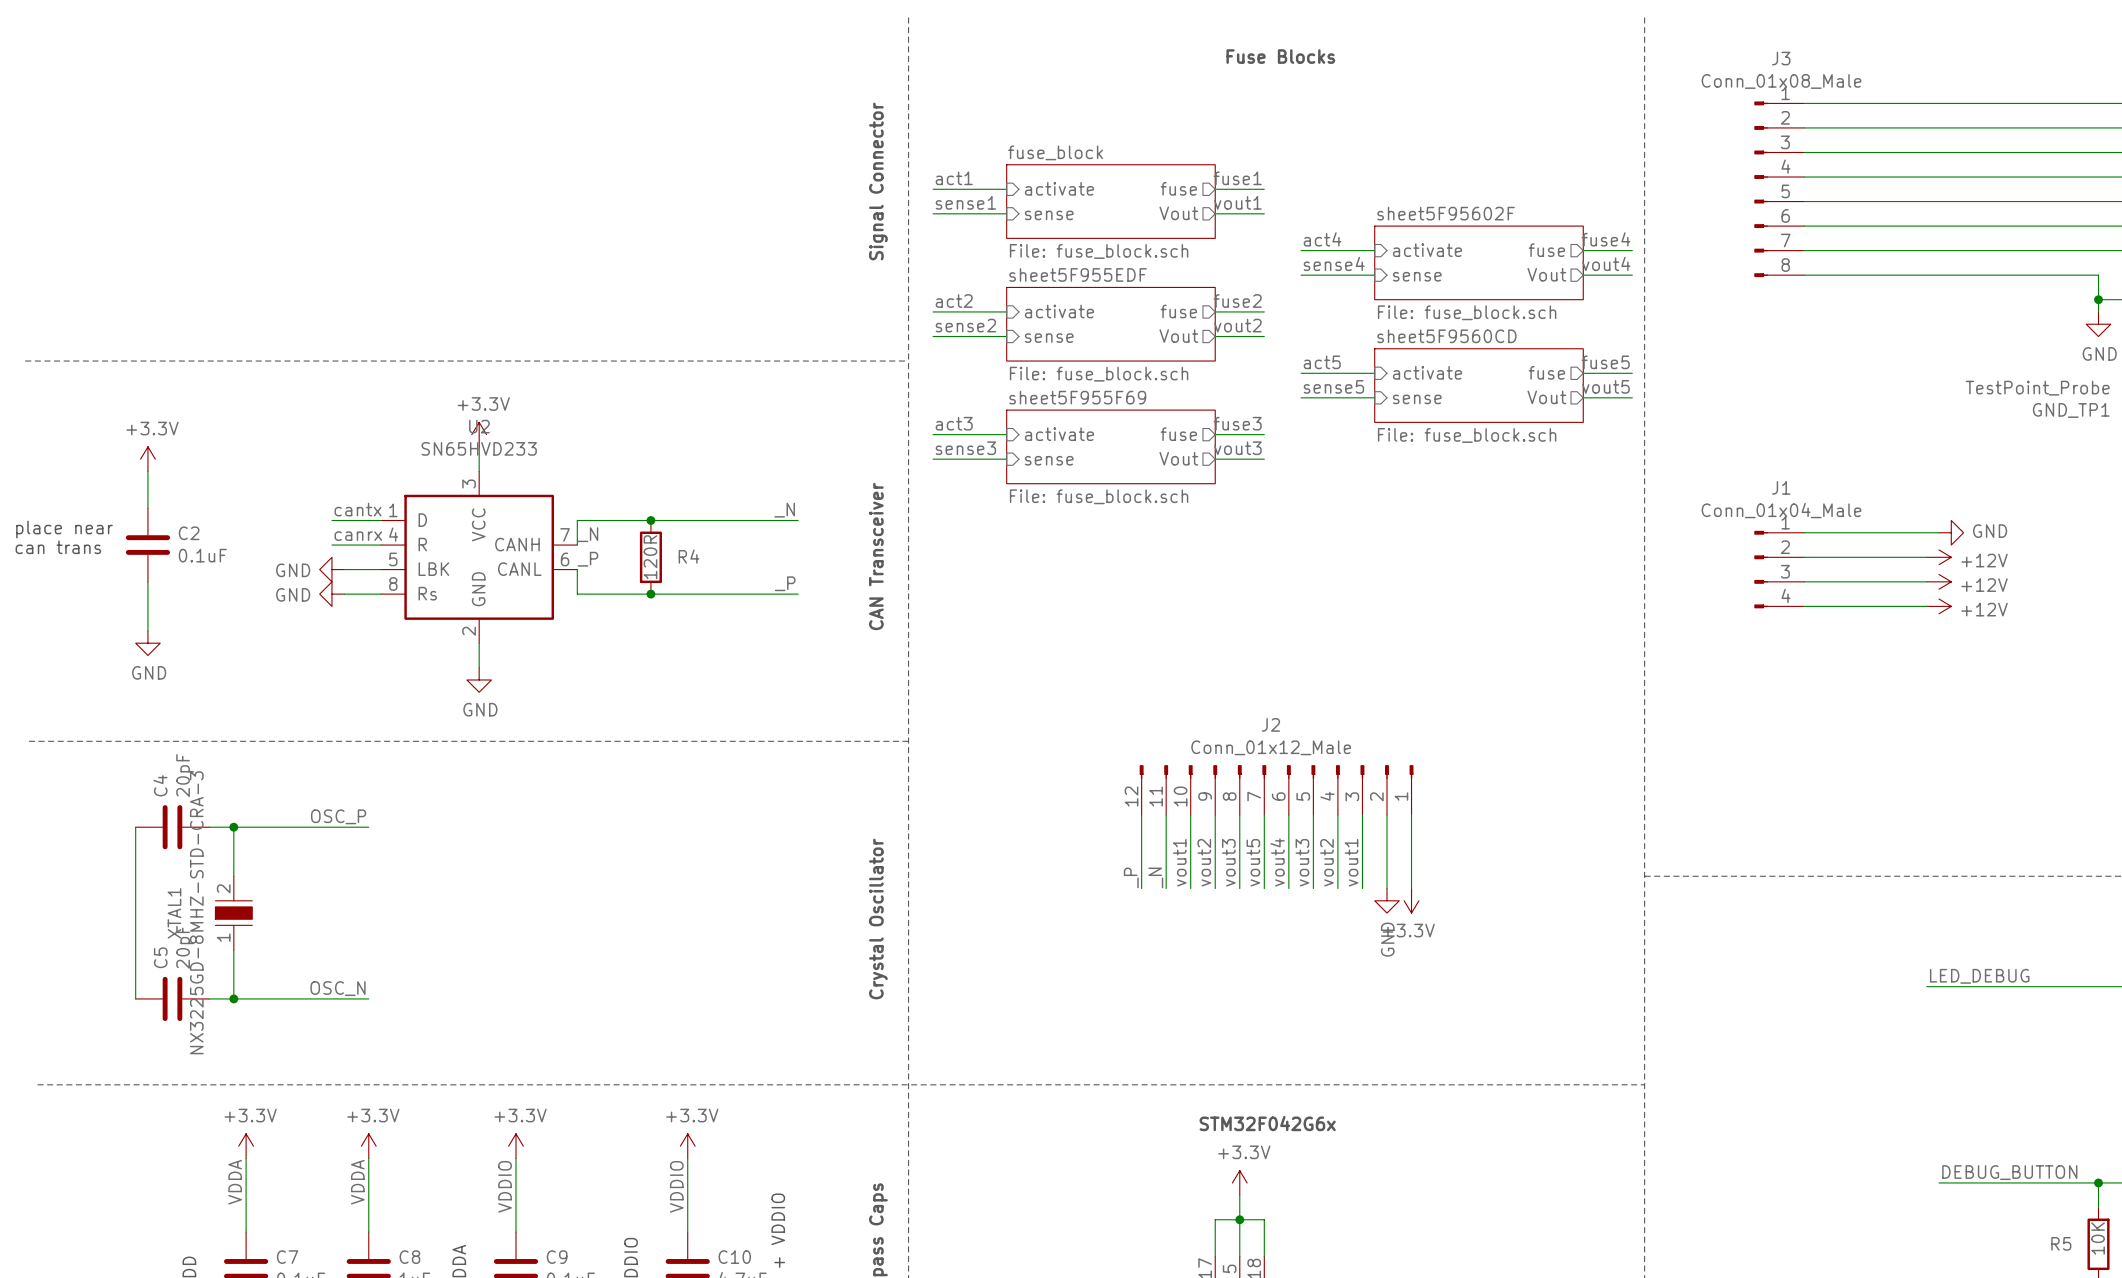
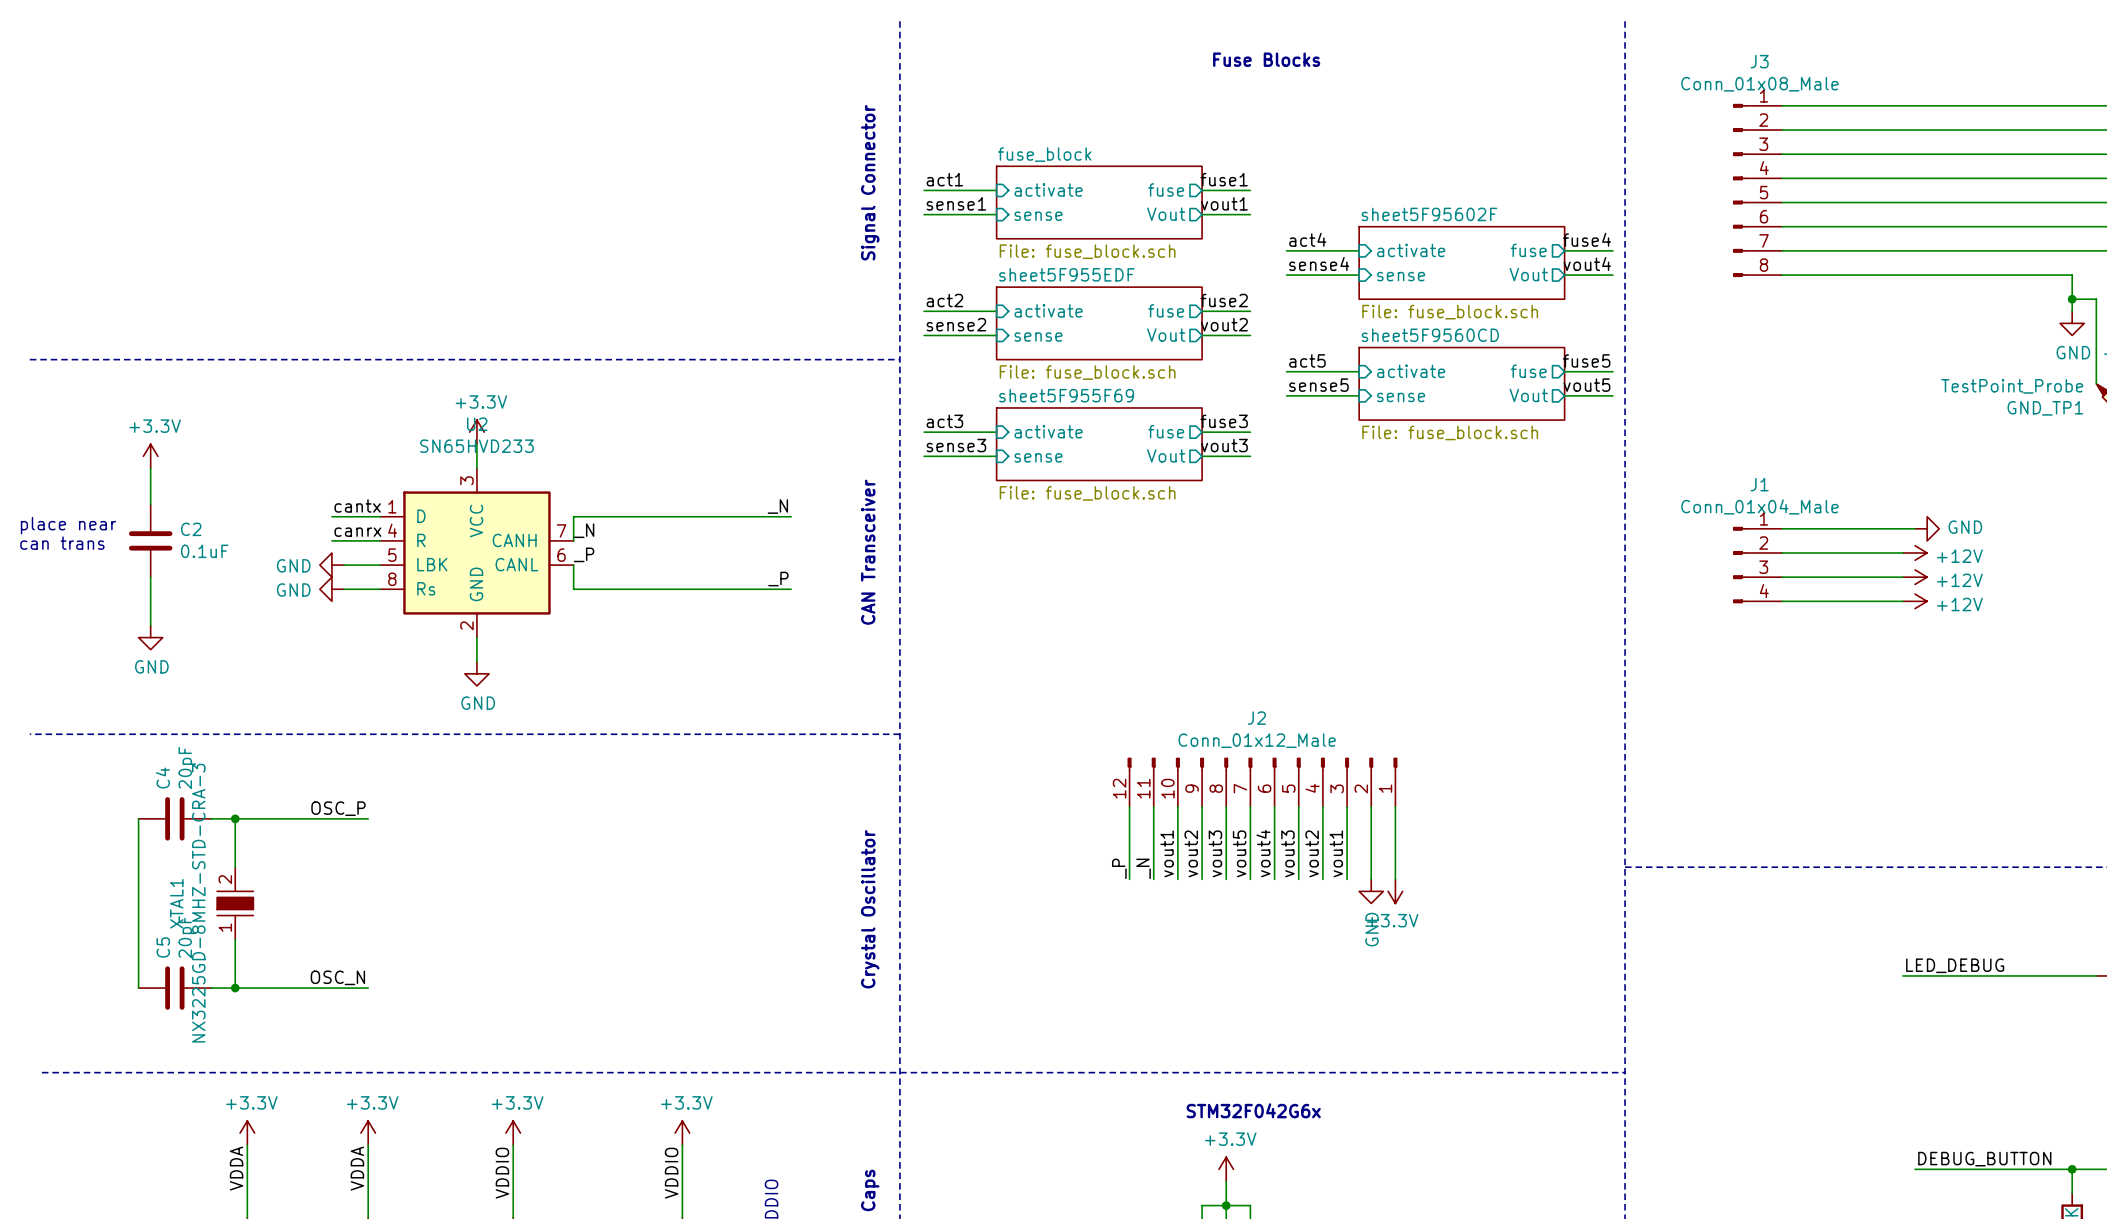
junction: (650, 520) -> none
R4: 120R (650, 557) -> none
junction: (650, 594) -> none

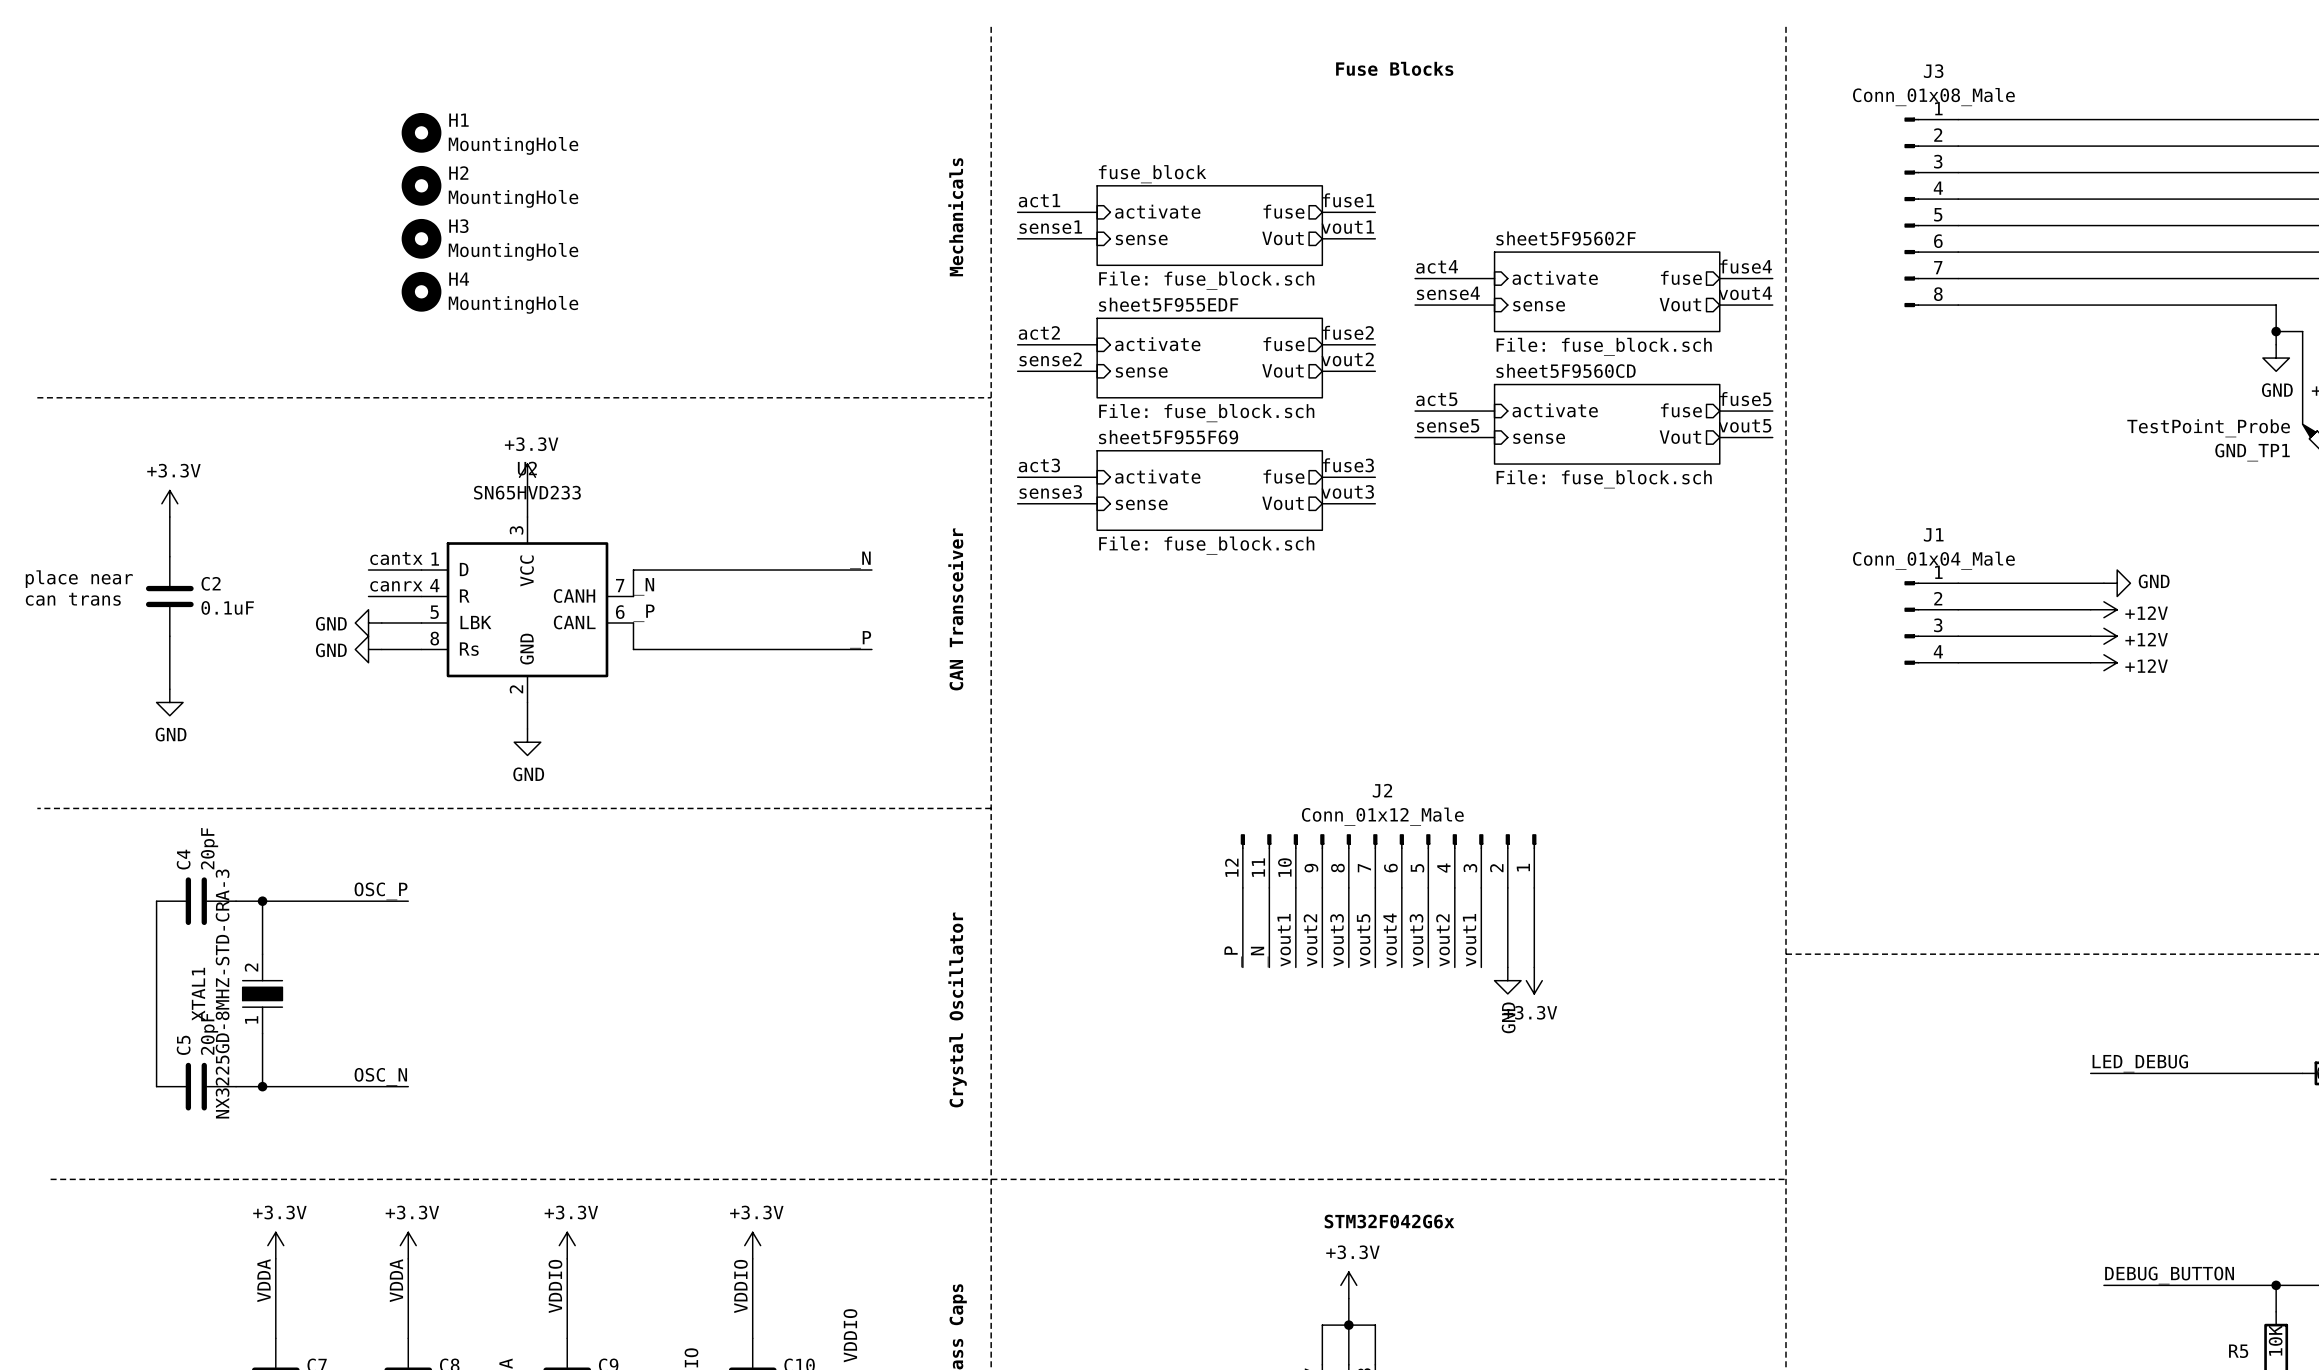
H1: none -> MountingHole (421, 132)
H2: none -> MountingHole (421, 185)
text: Signal Connector (870, 182) -> none
text: none -> Mechanicals (955, 217)
H3: none -> MountingHole (421, 238)
H4: none -> MountingHole (421, 291)

